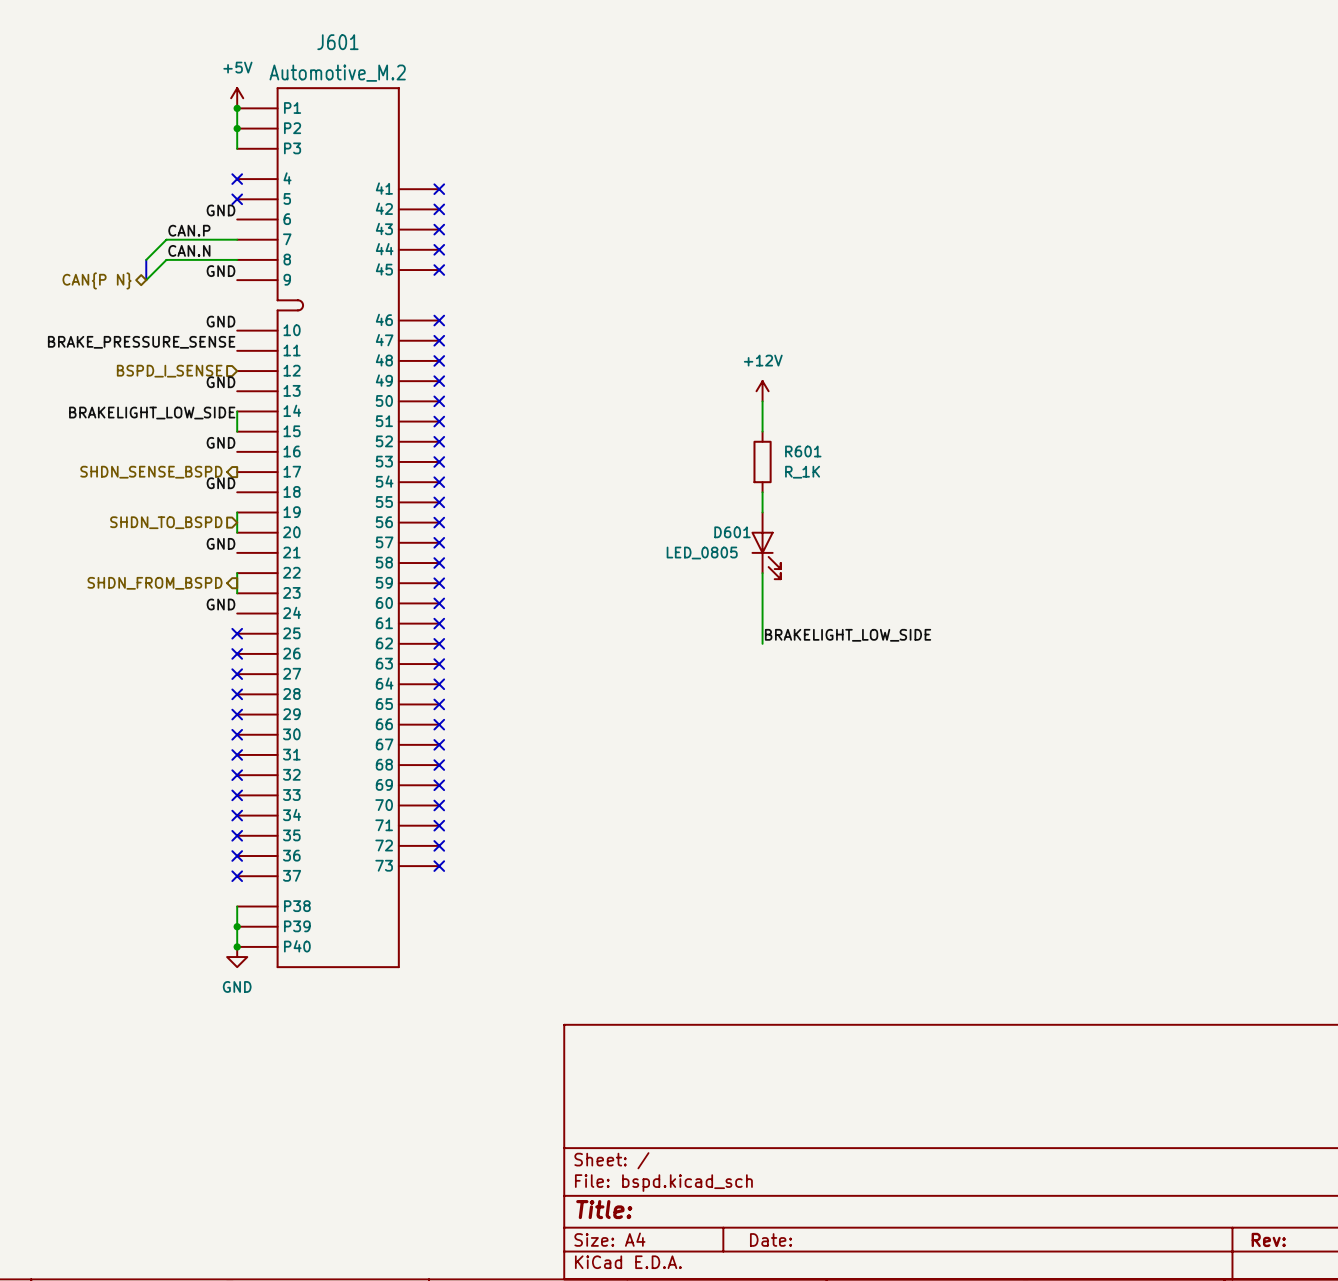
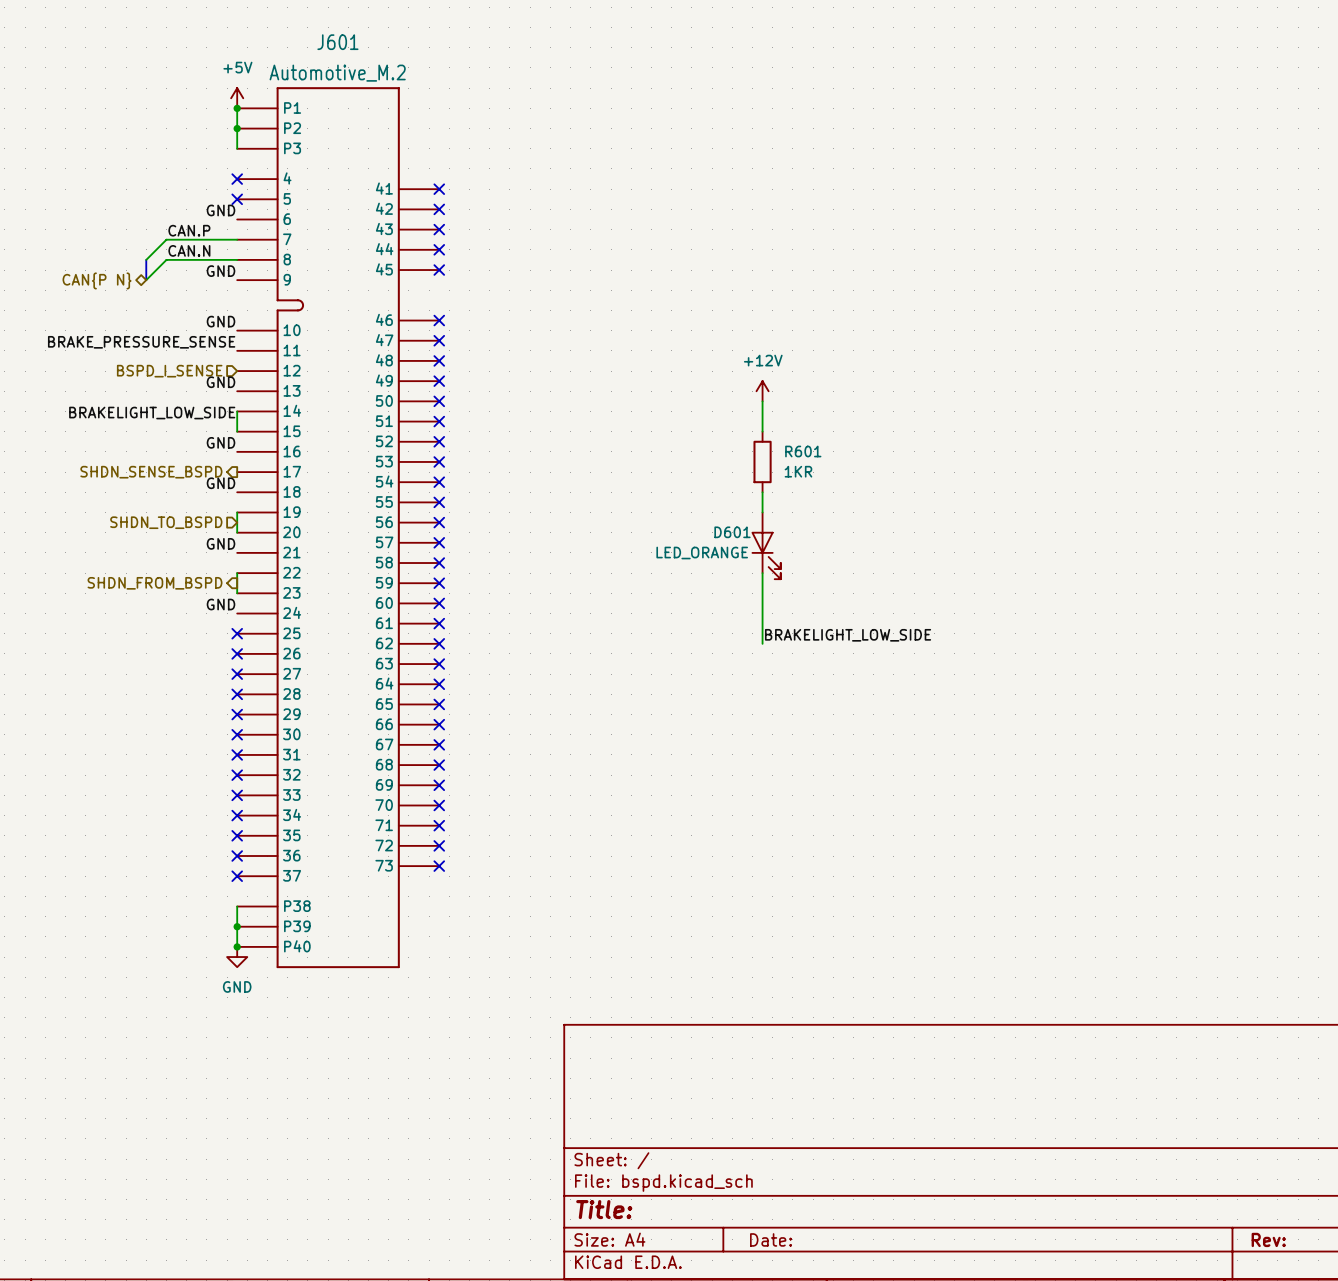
R601 value: R_1K (802, 472) -> 1KR (798, 471)
D601 value: LED_0805 (702, 553) -> LED_ORANGE (702, 553)

